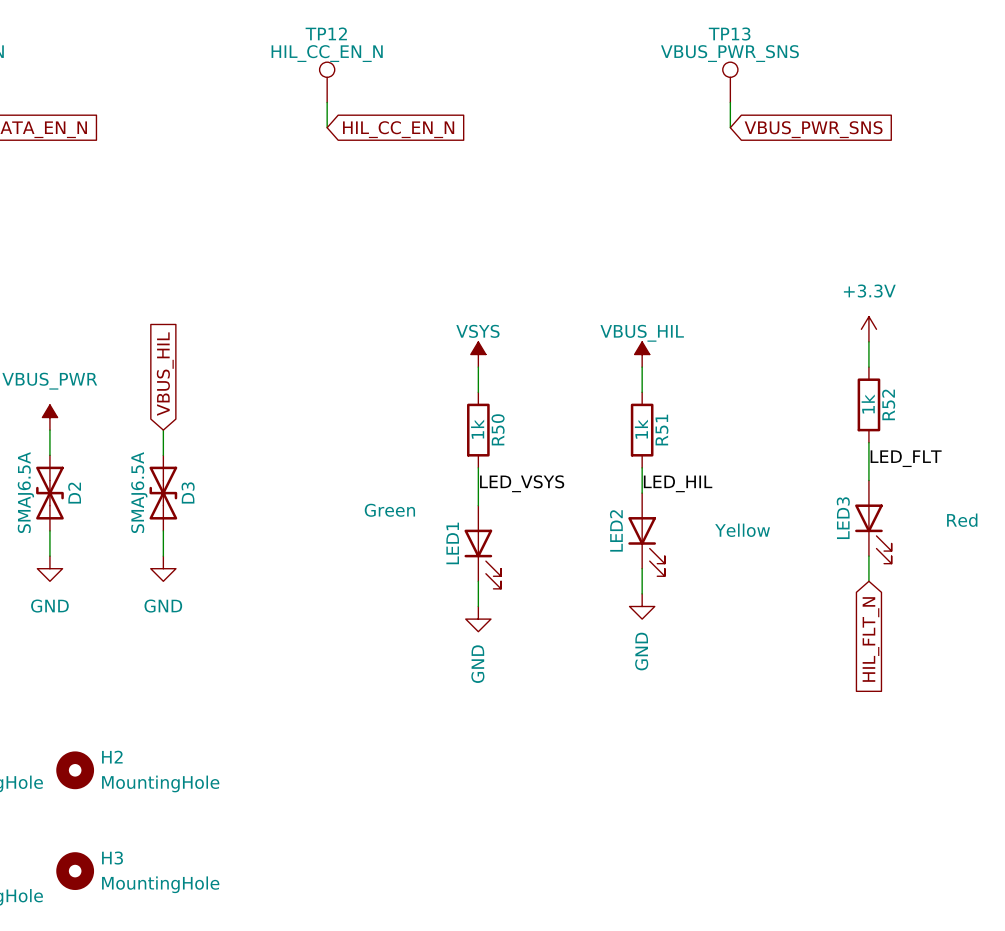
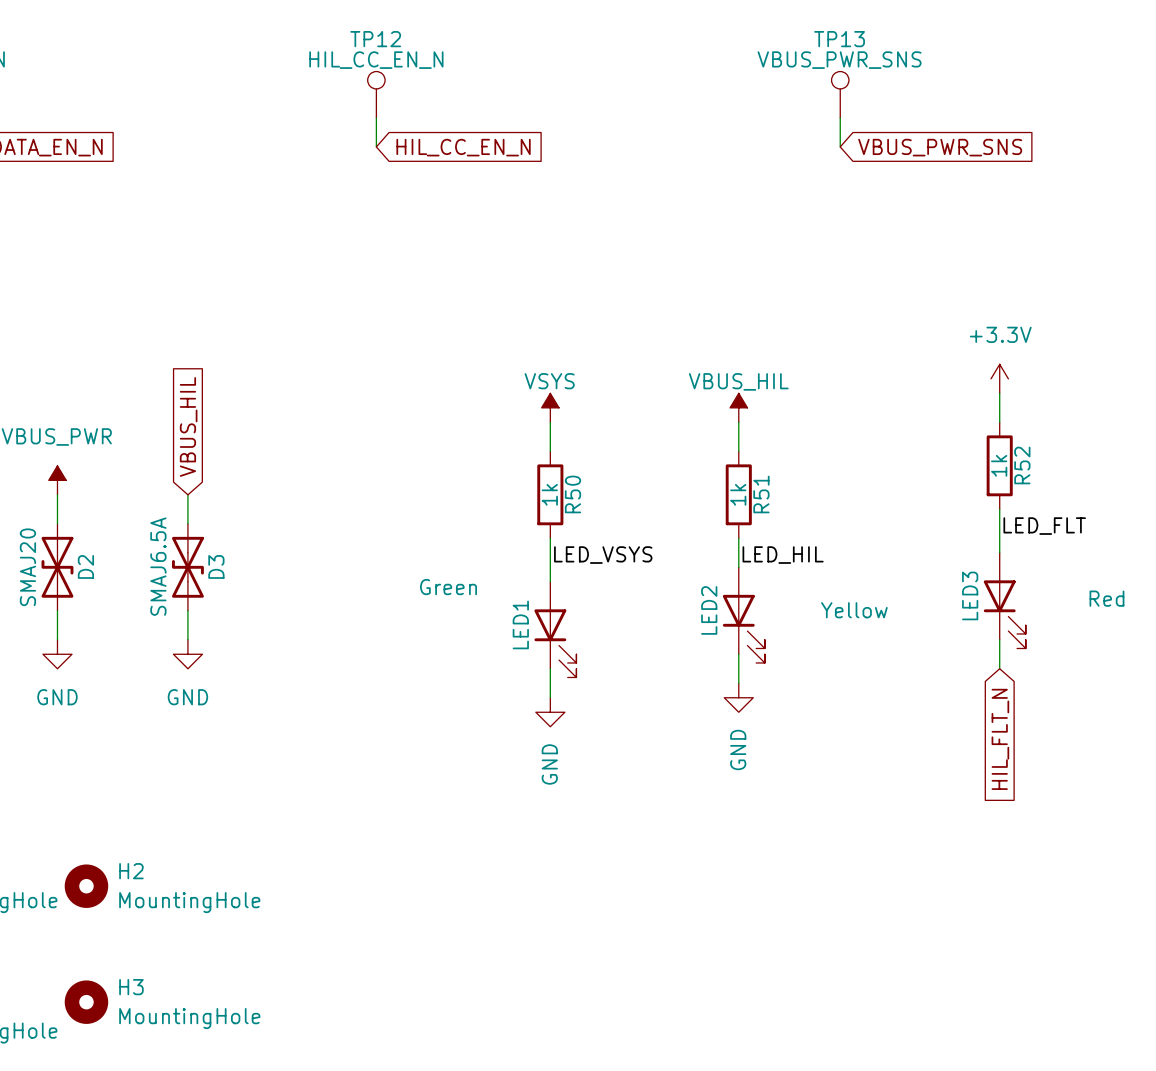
D2 value: SMAJ6.5A (25, 492) -> SMAJ20 (27, 567)

